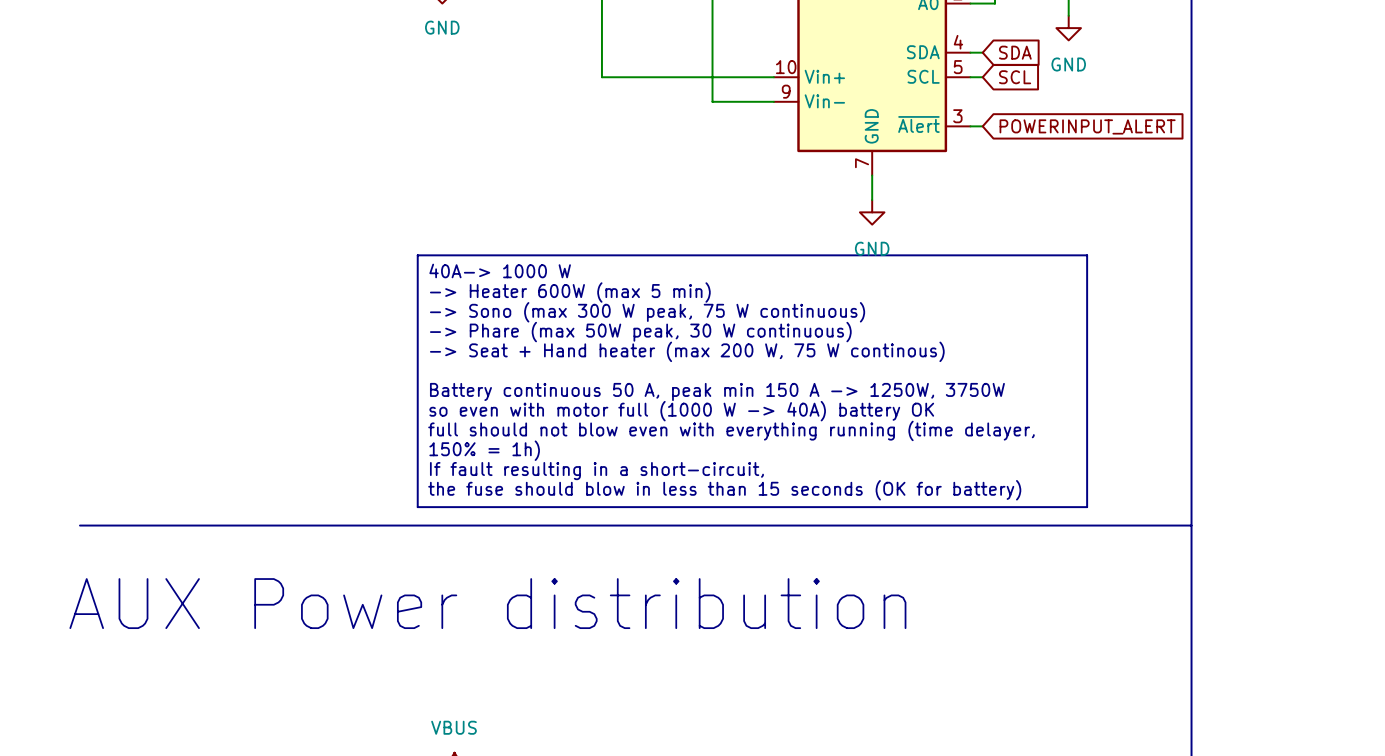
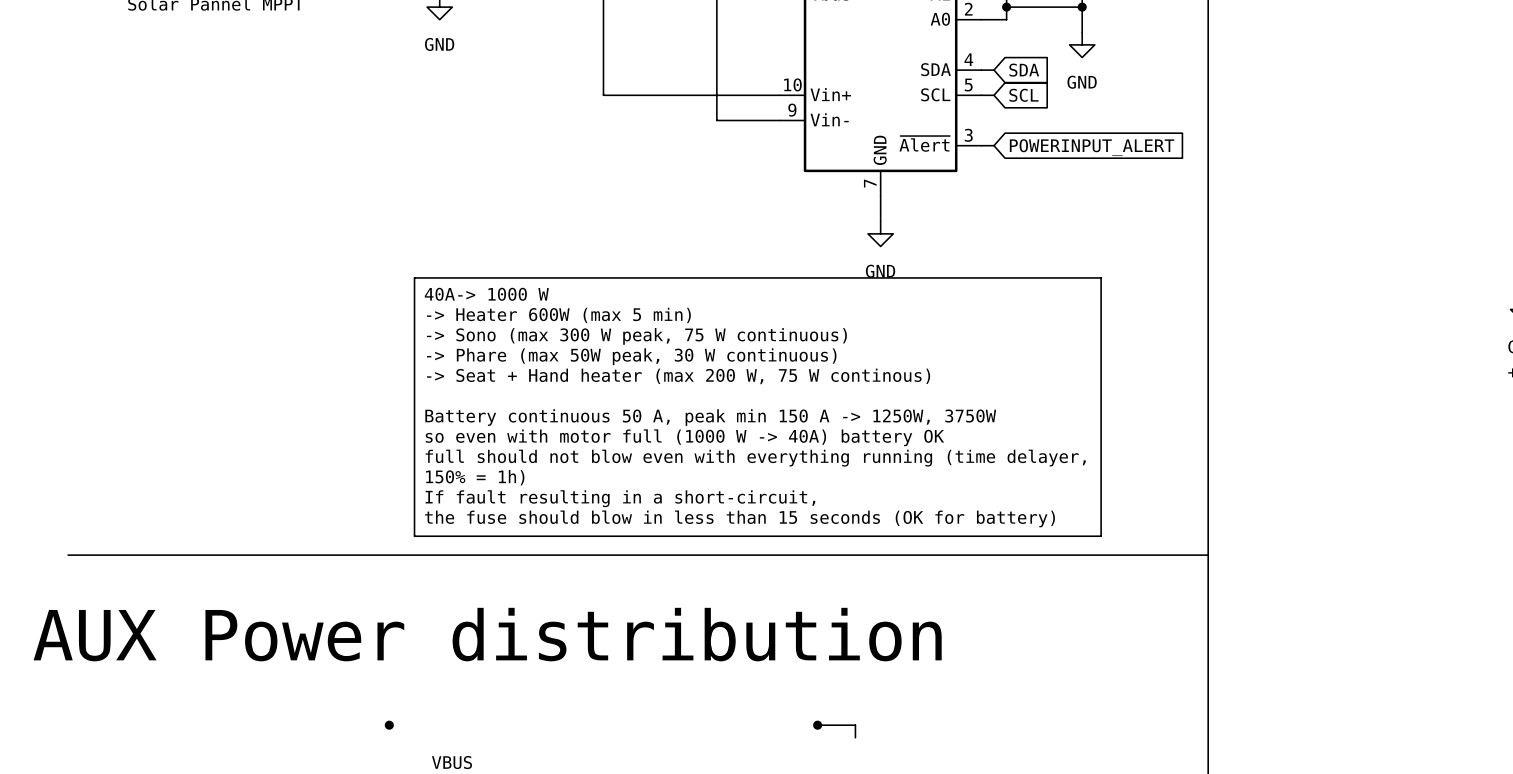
junction: none -> (389, 725)
wire: none -> (817, 725) (855, 725) (855, 737)
junction: none -> (817, 725)

